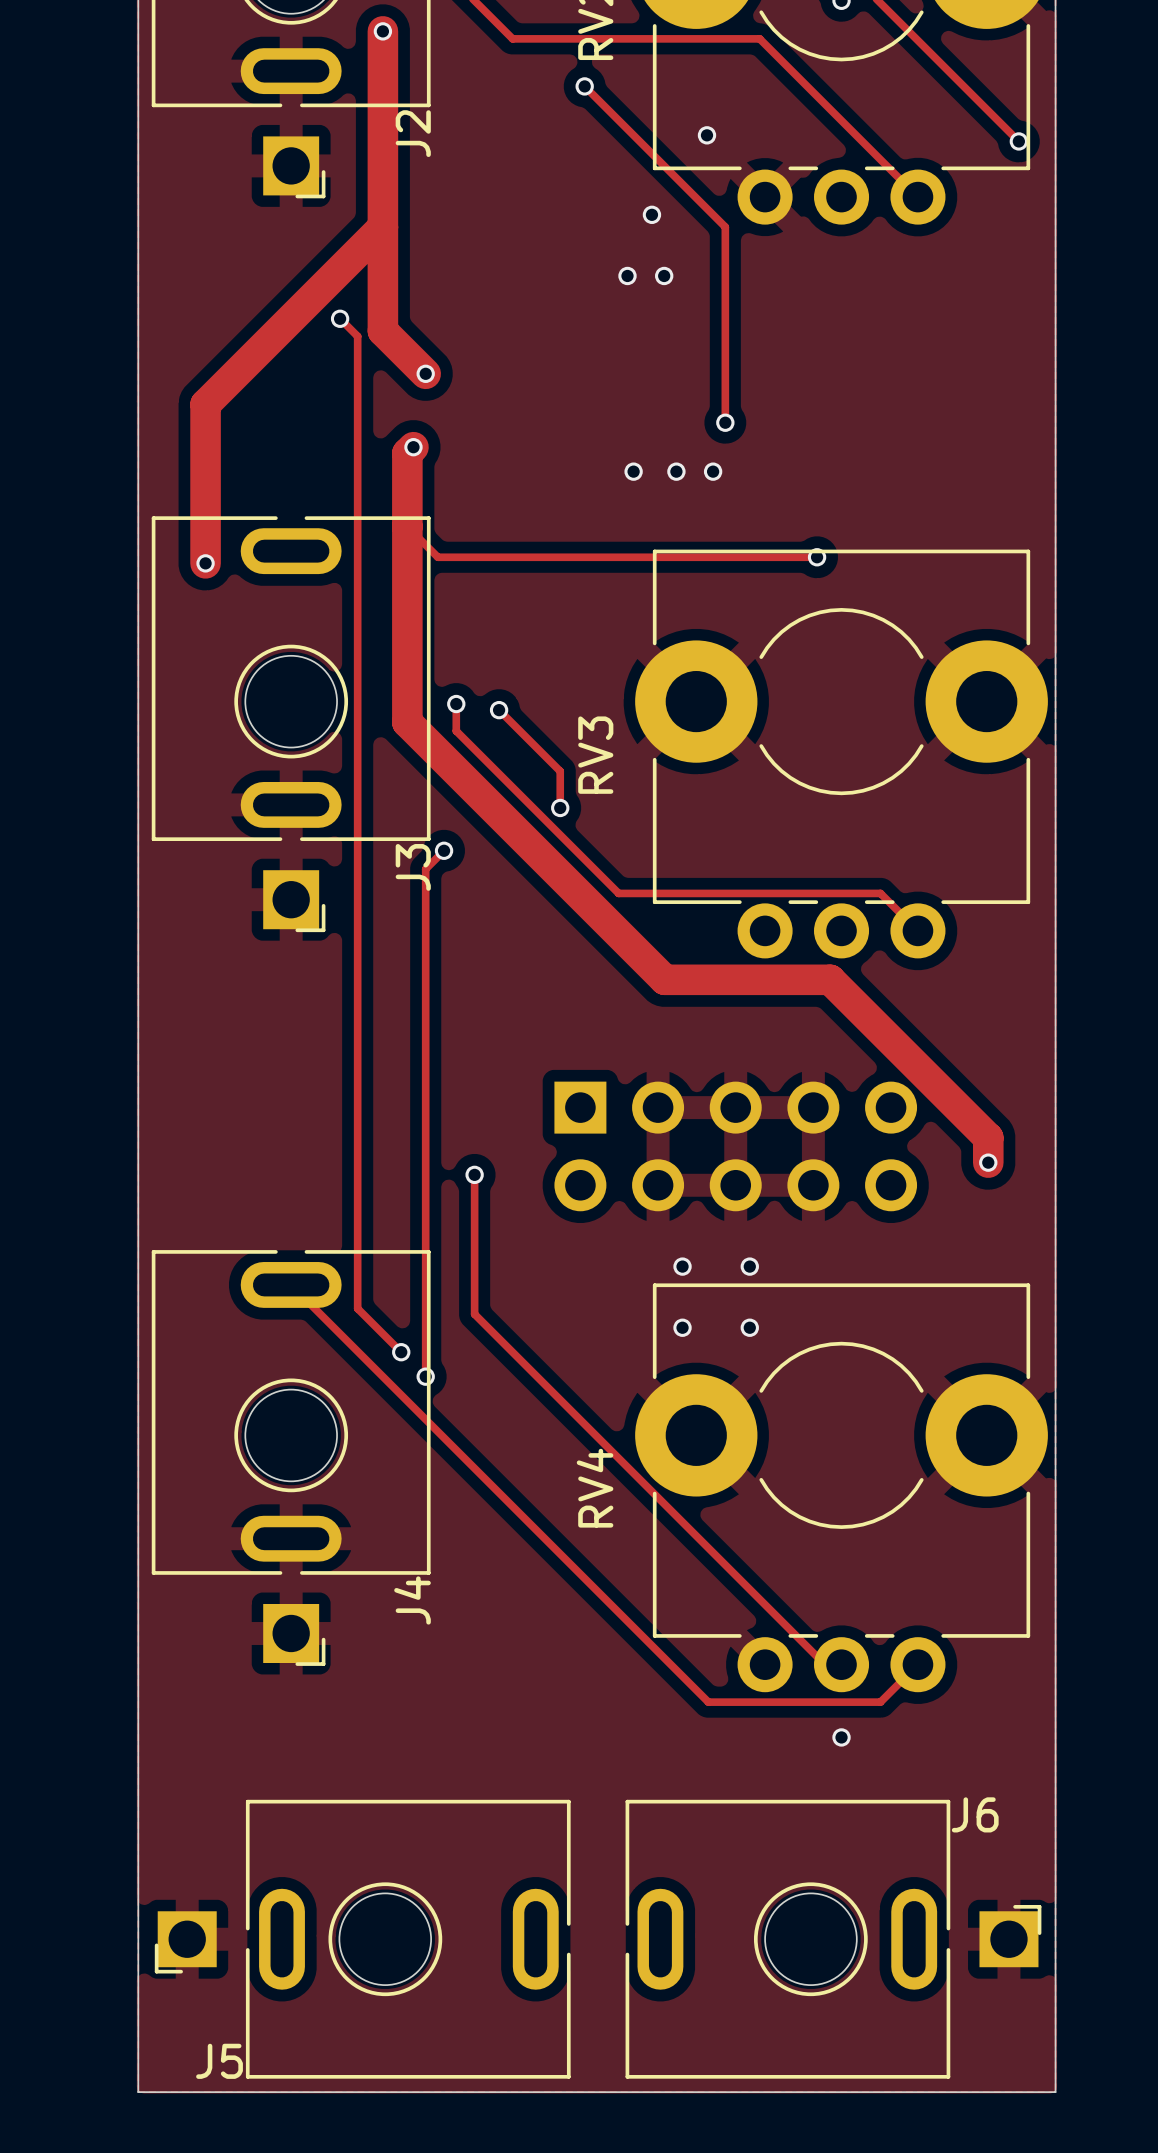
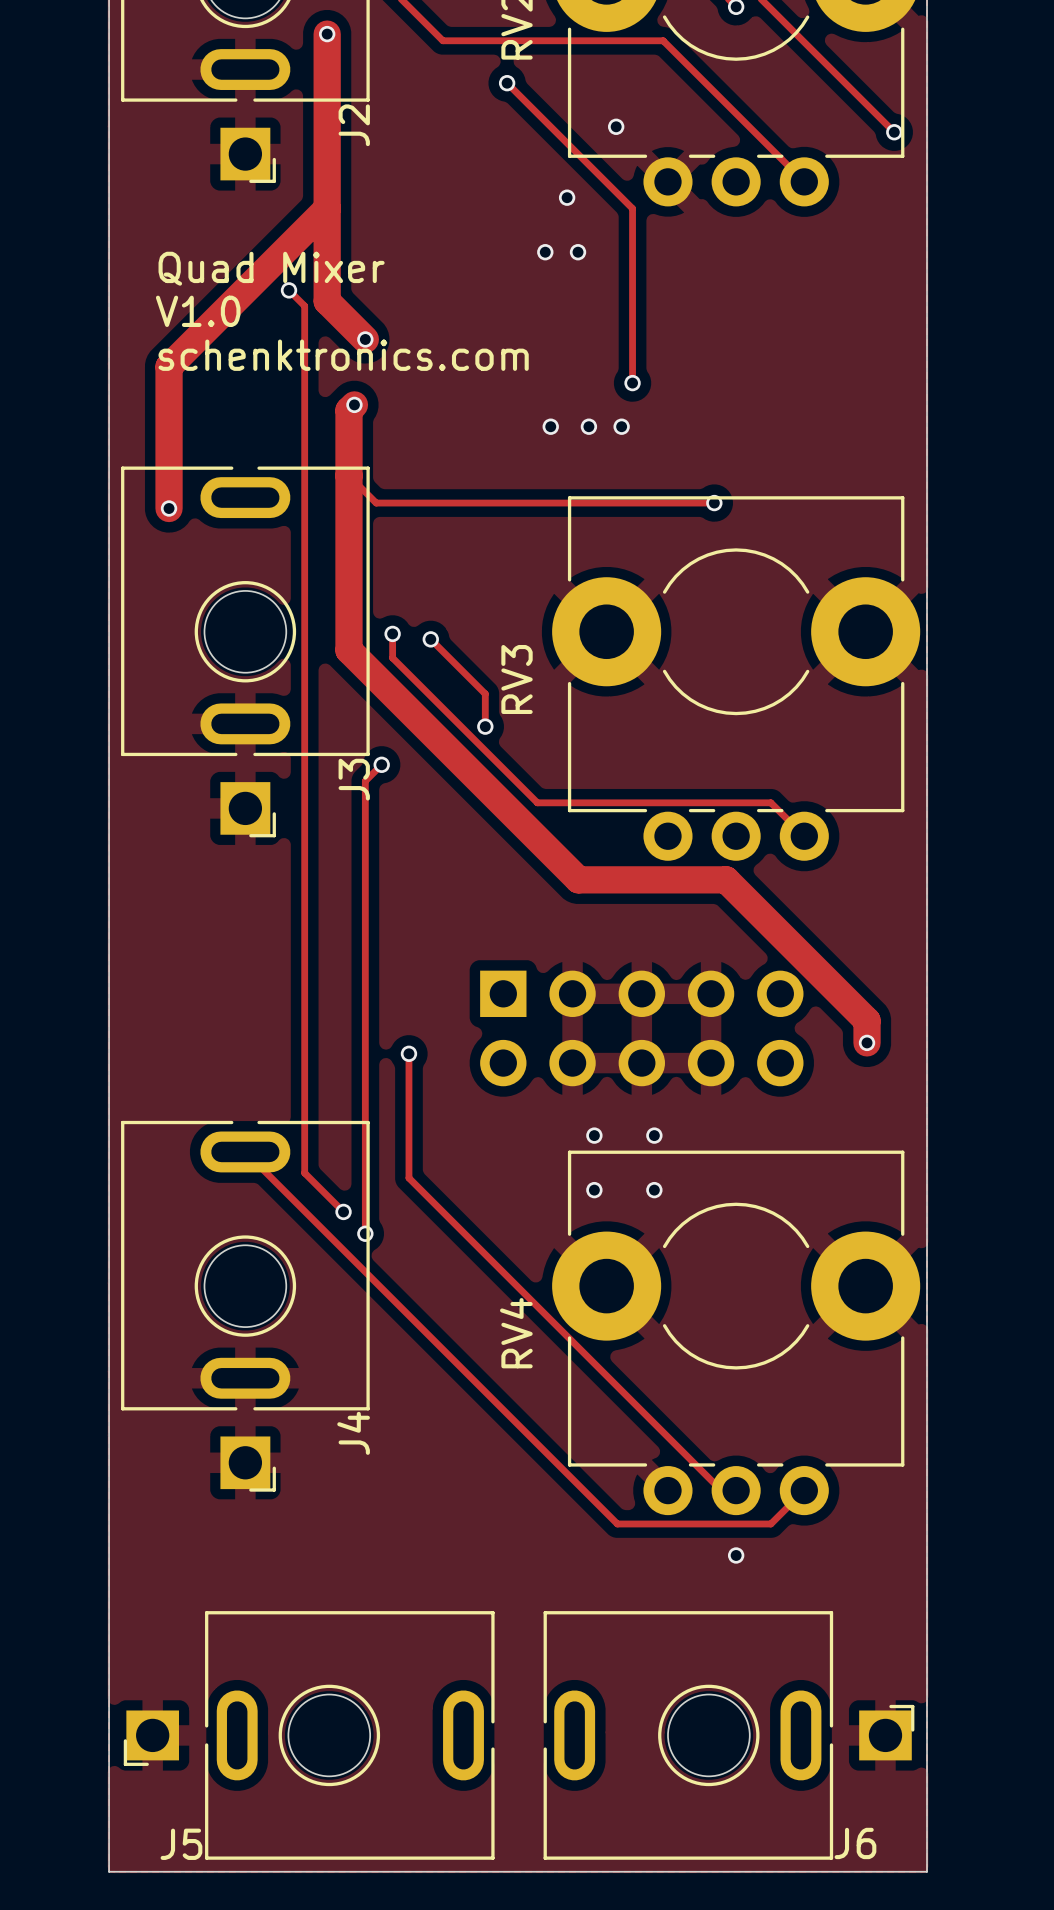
text: none -> Quad Mixer (271, 268)
text: none -> V1.0 (198, 311)
text: none -> schenktronics.com (343, 355)
J6 name position: J6 (975, 1814) -> J6 (855, 1843)

